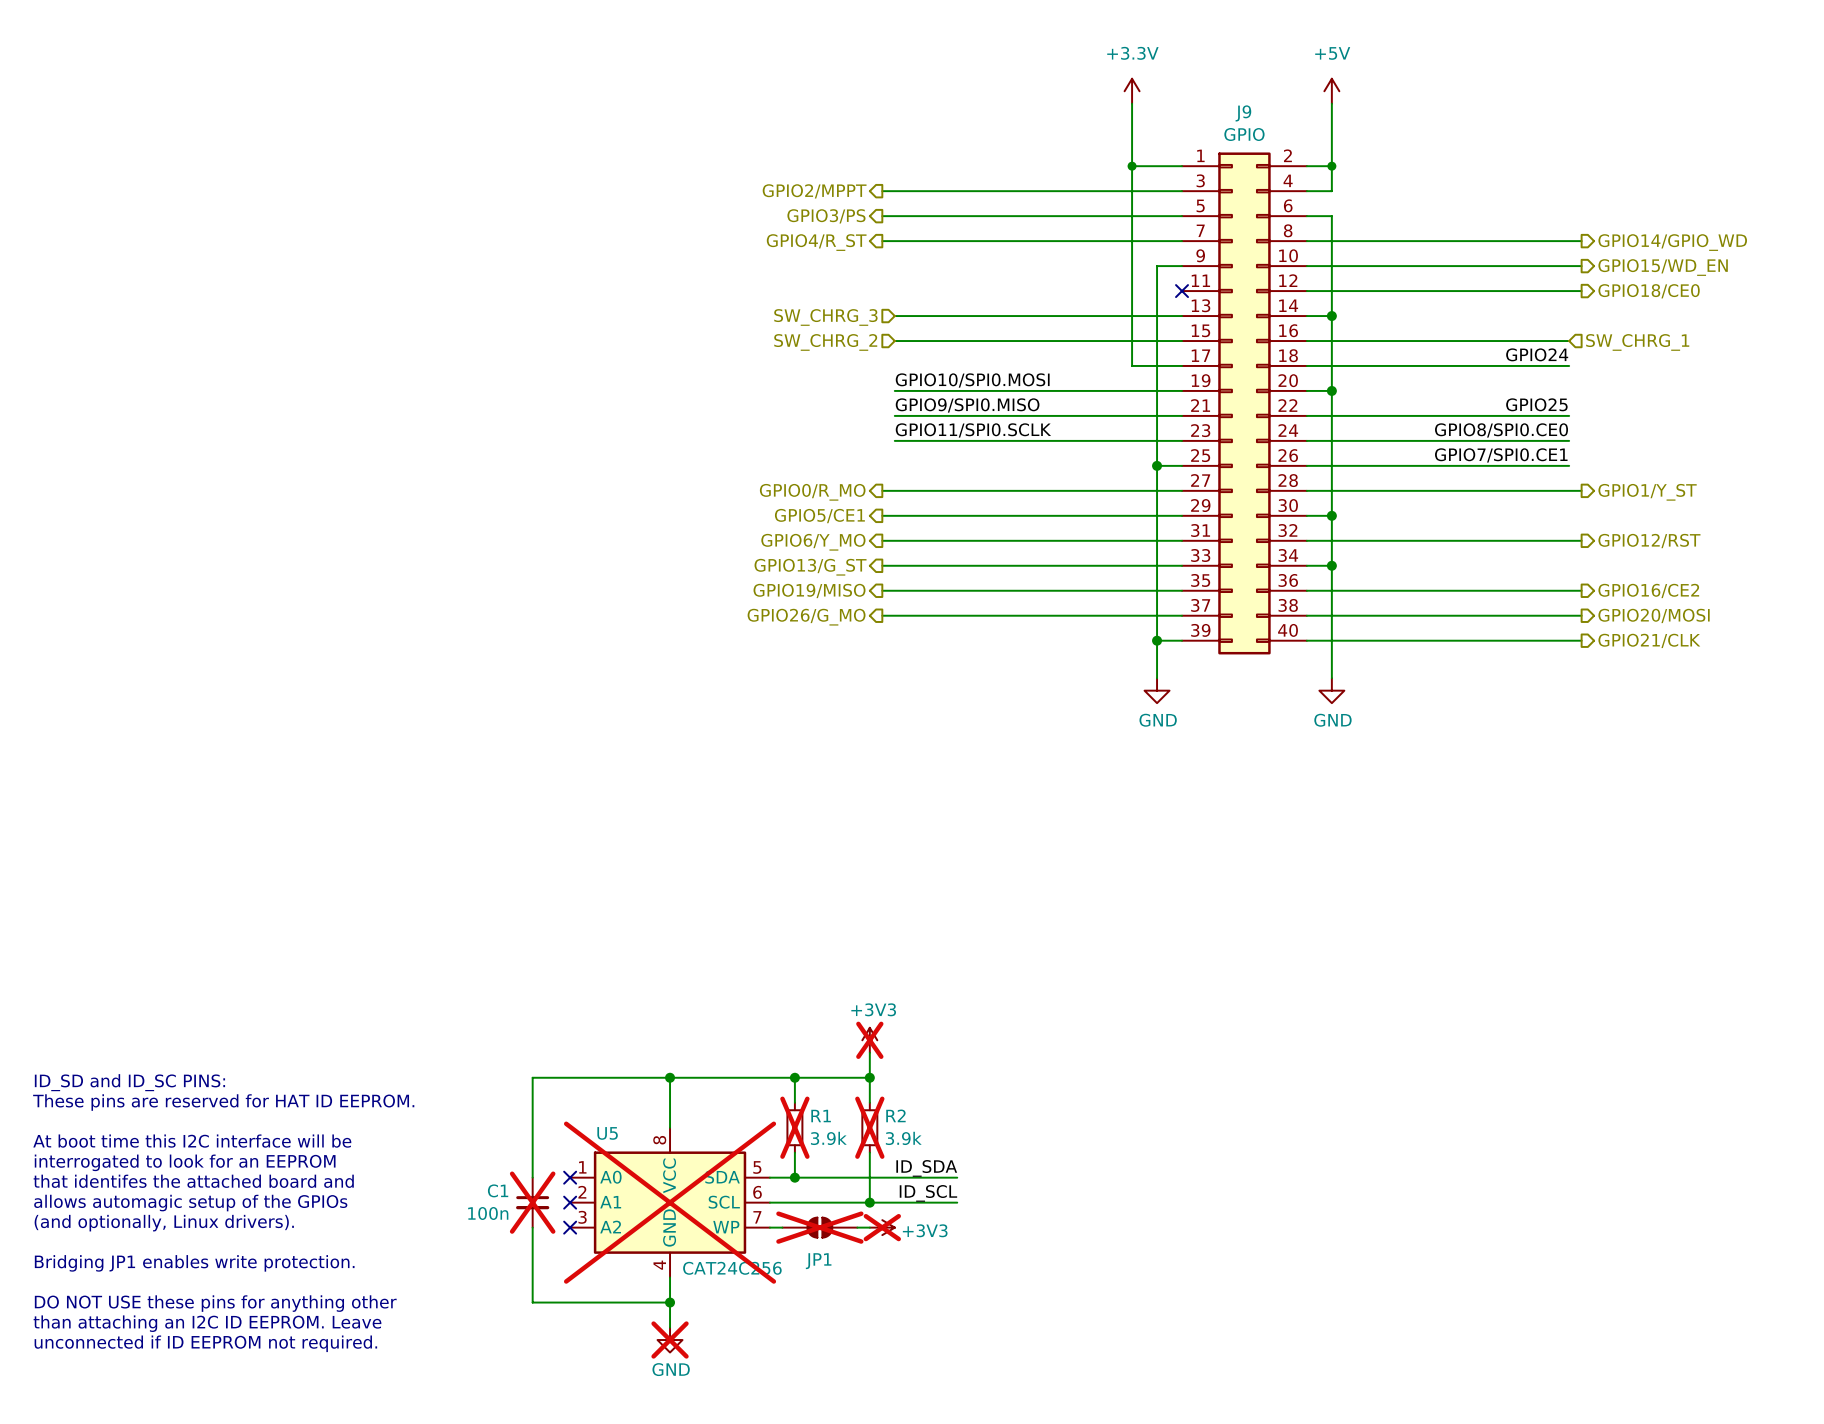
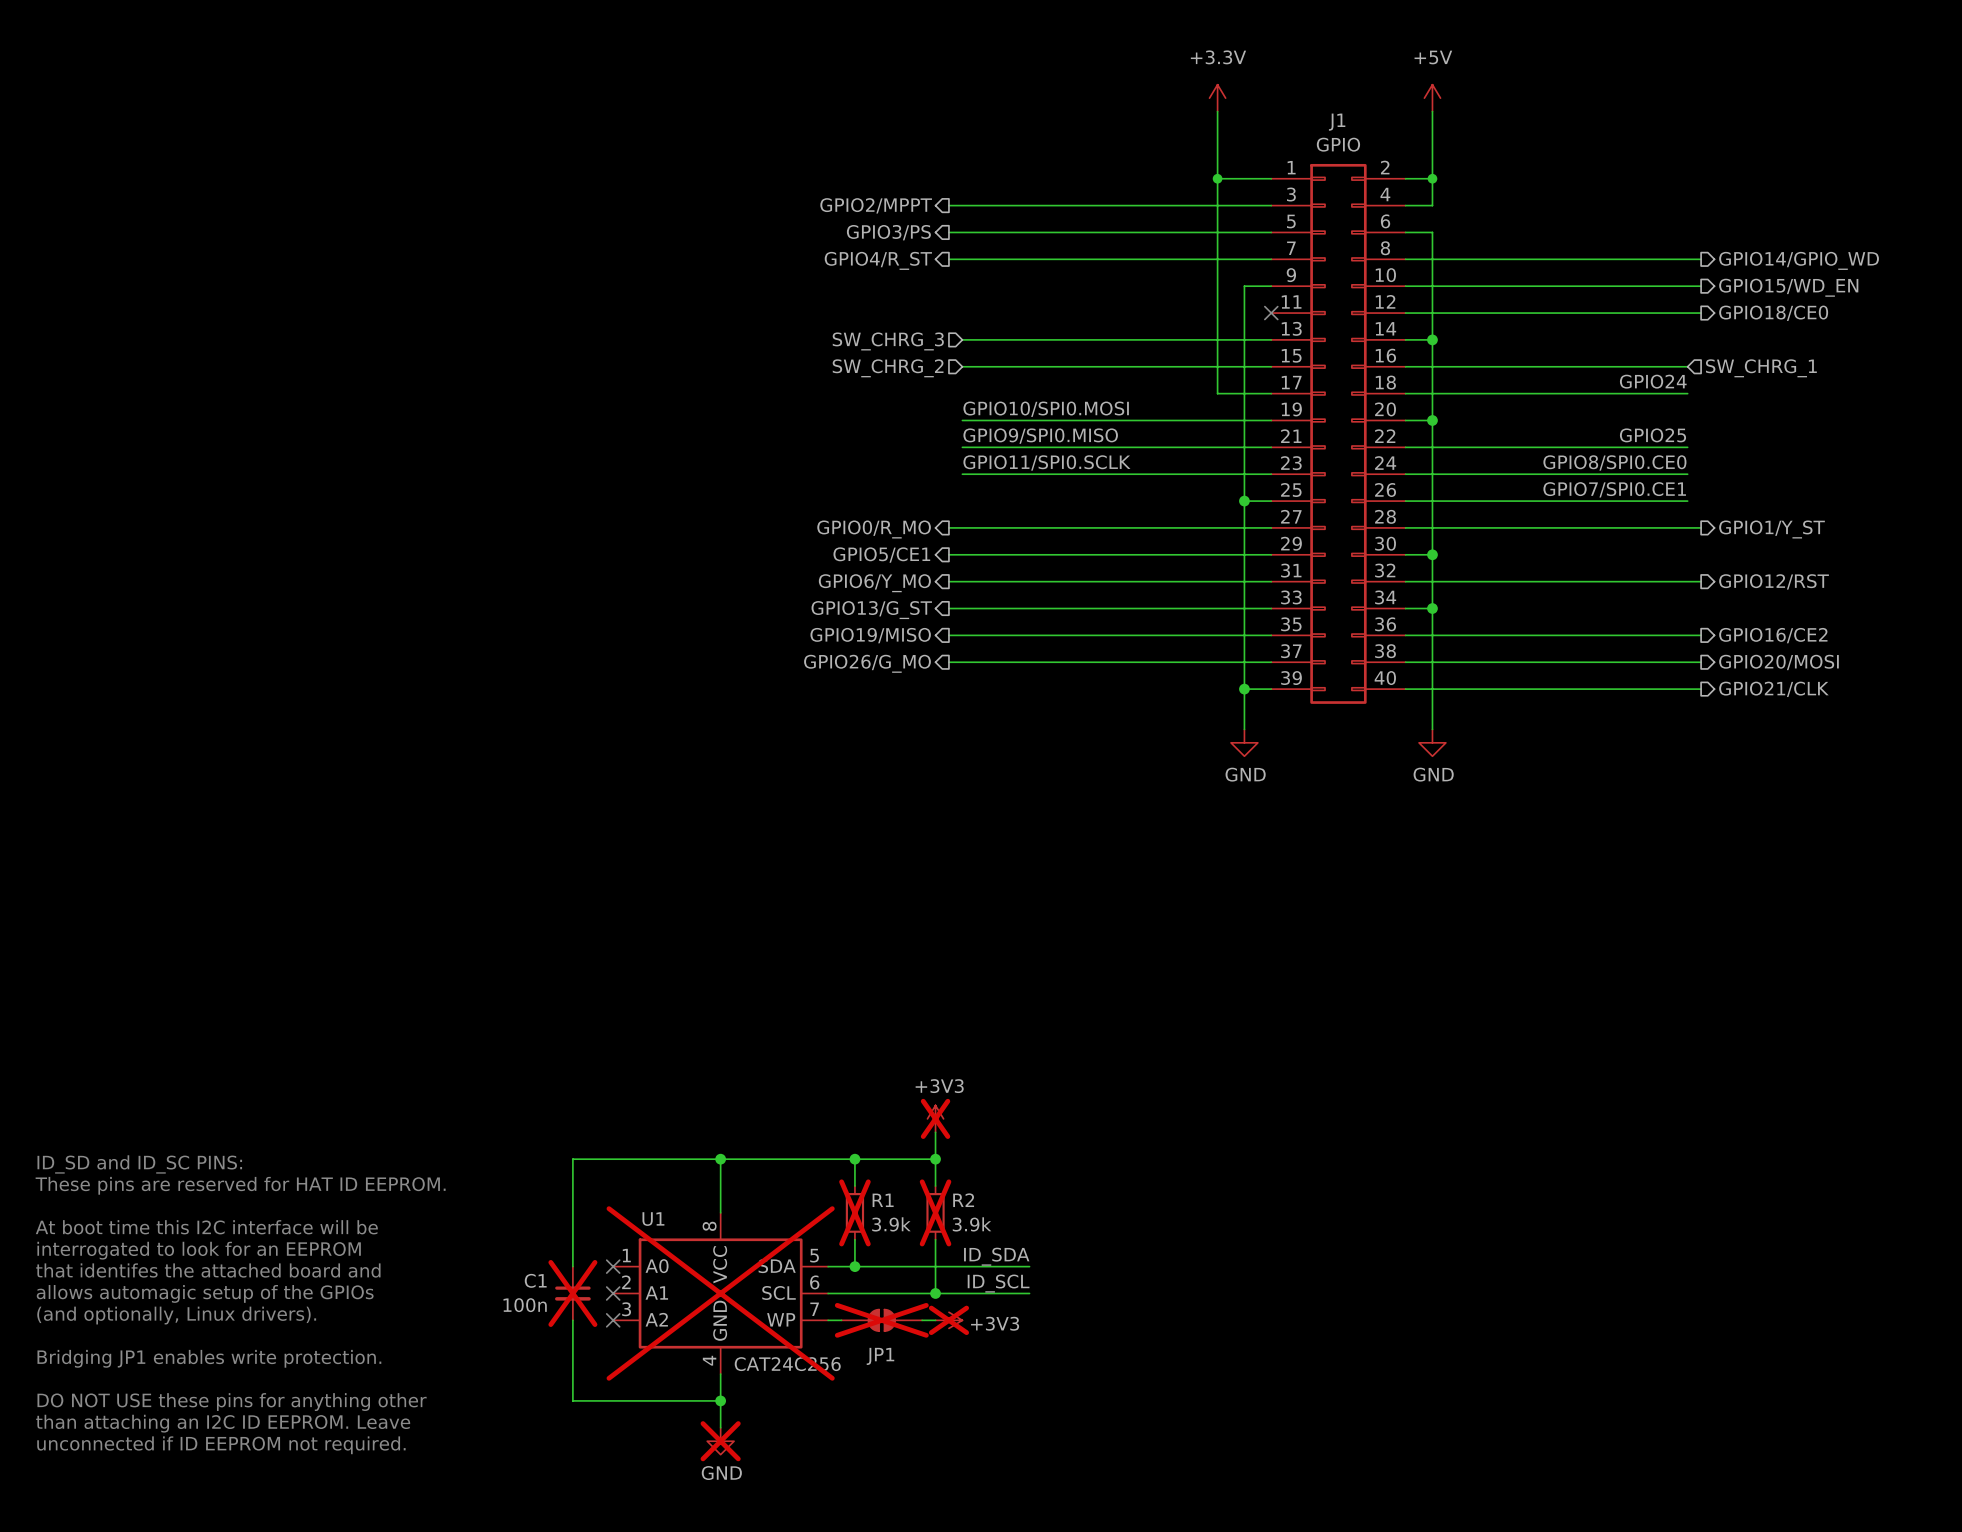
J9 name: J9 (1243, 113) -> J1 (1337, 122)
U5 name: U5 (607, 1133) -> U1 (653, 1219)

